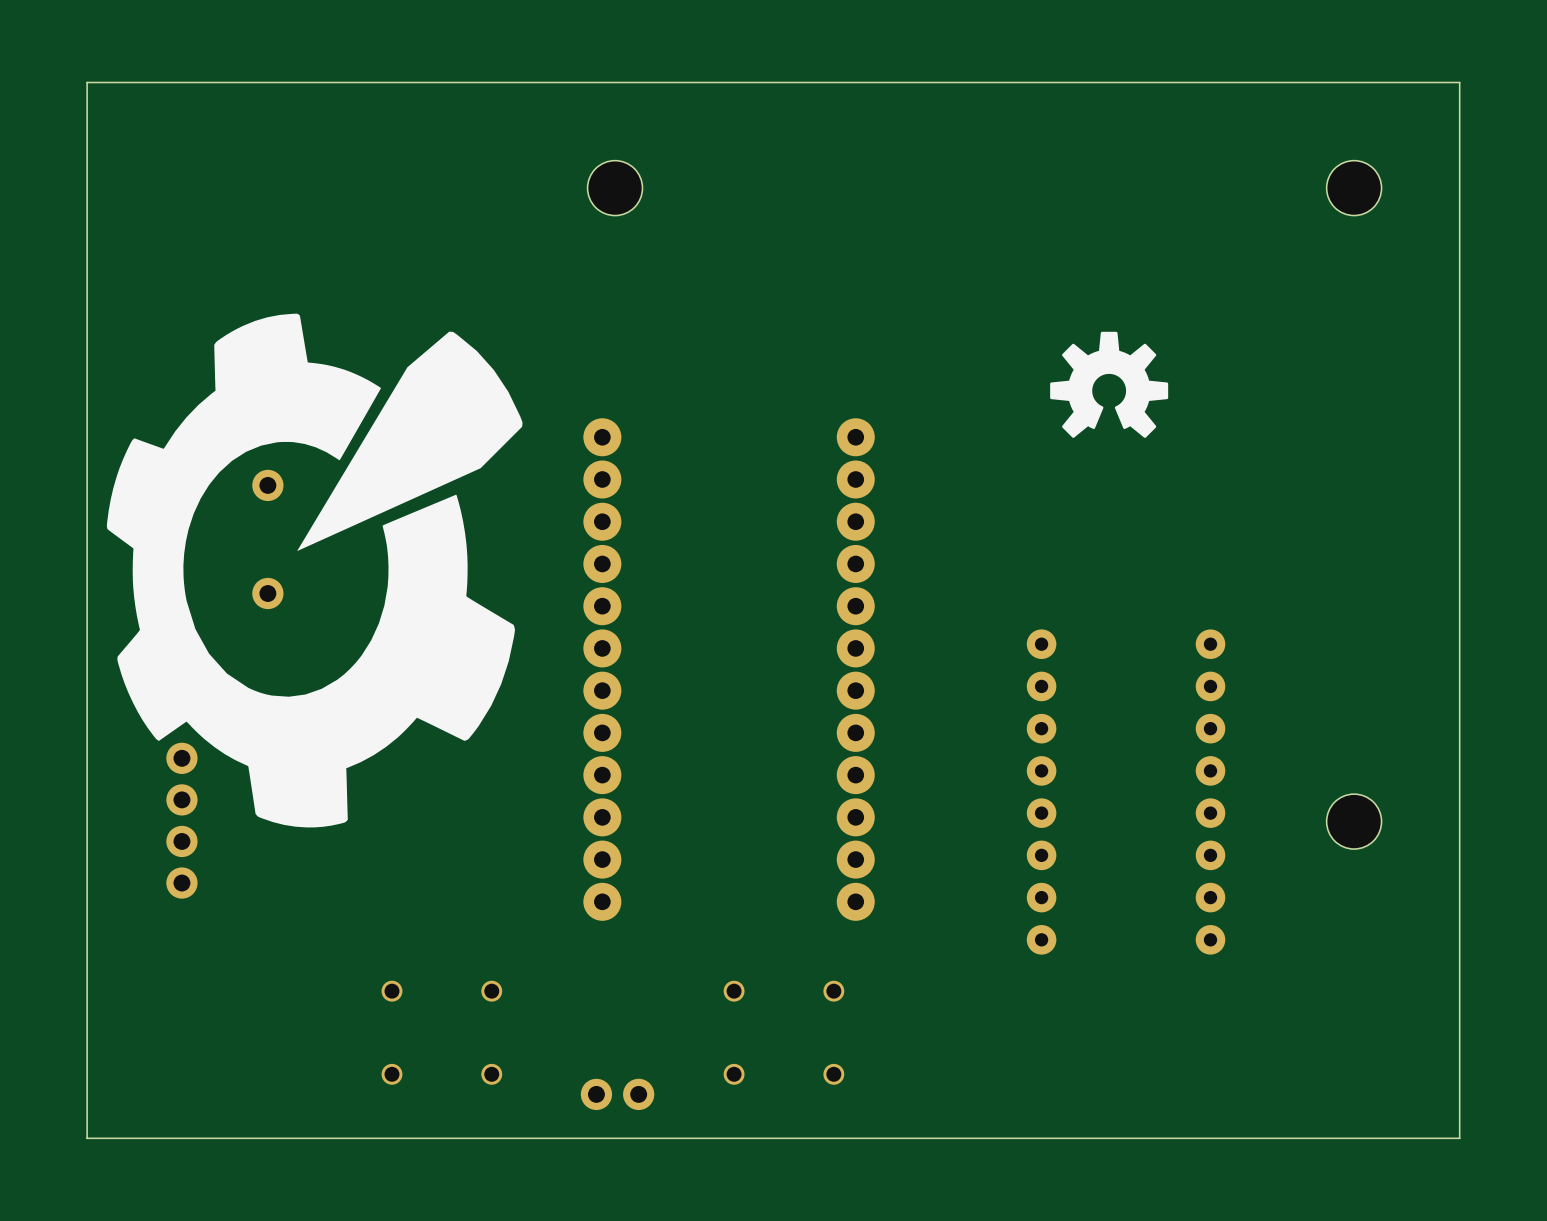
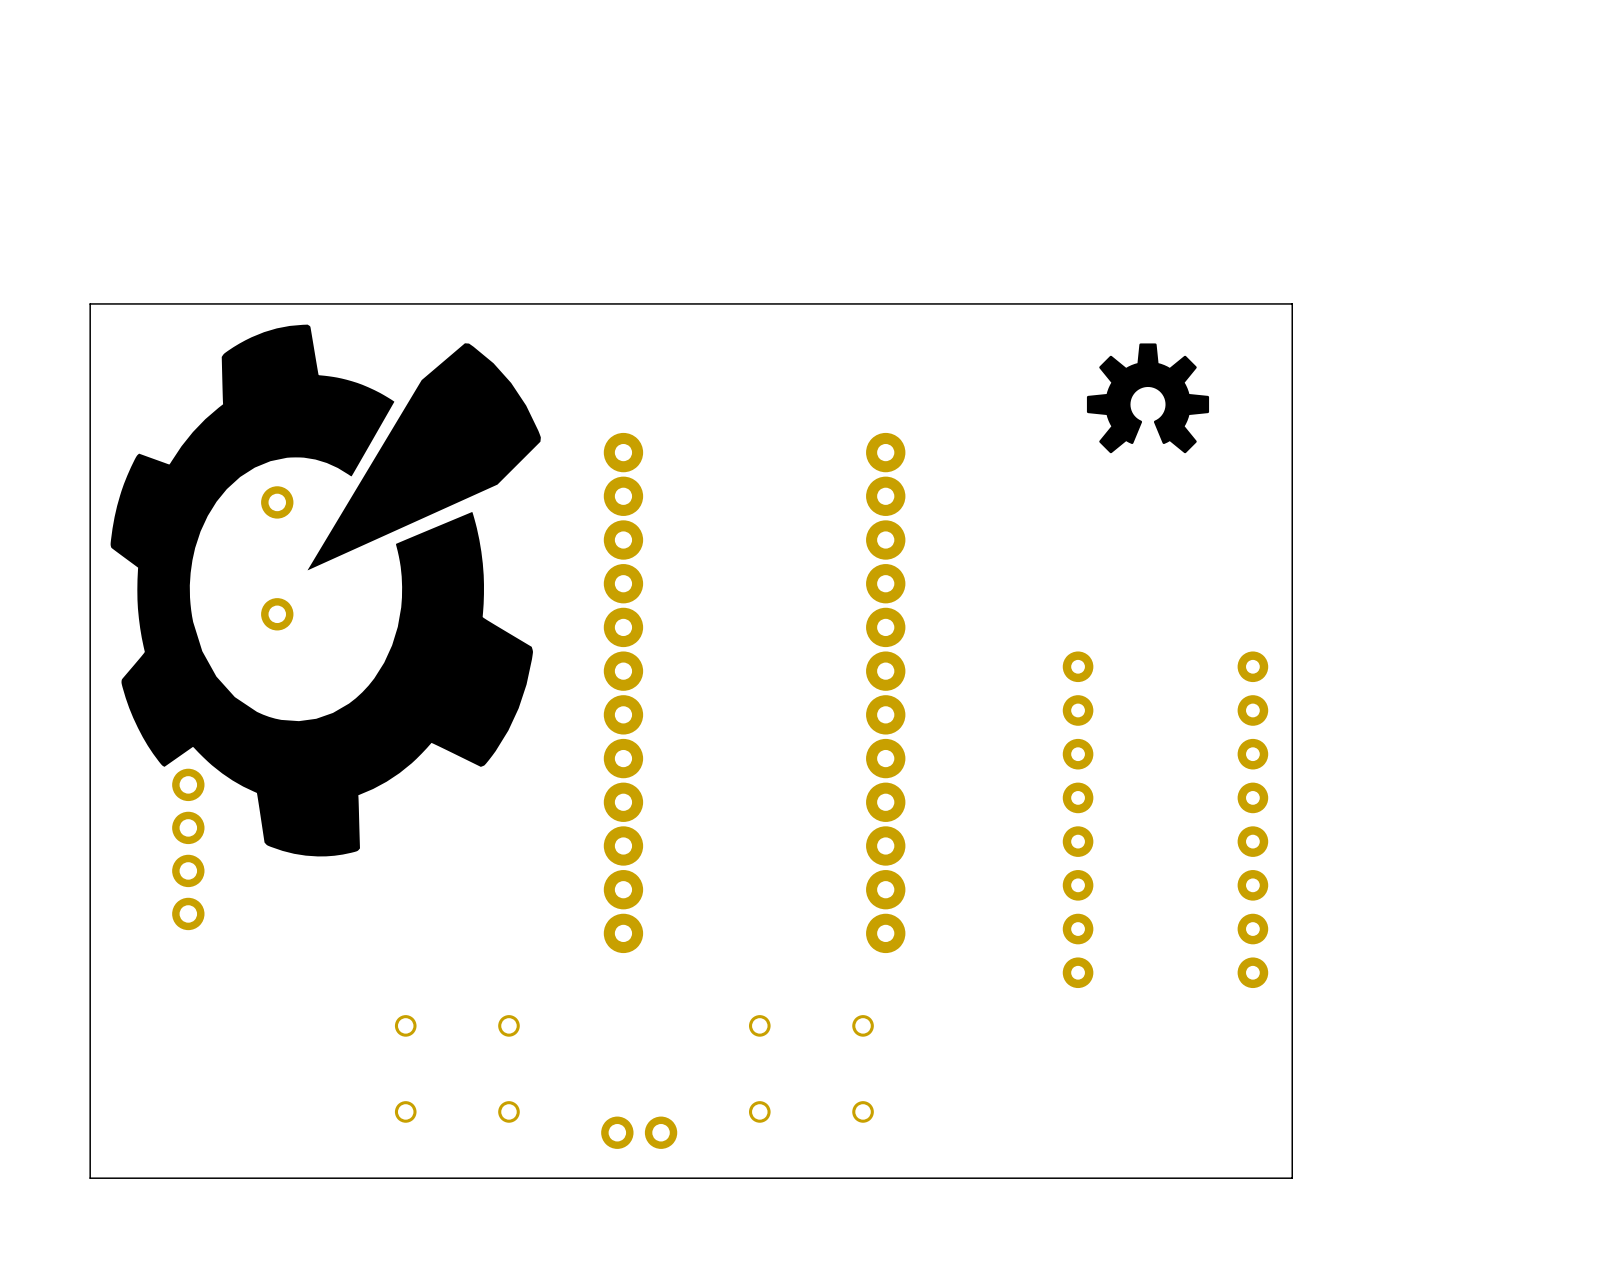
part: (615, 188) -> none
part: (1354, 188) -> none
board edge: (87, 293) (87, 82) (1459, 82) (1459, 1138) (1248, 1138) -> (90, 303) (1292, 303) (1292, 1178)
part: (1354, 821) -> none

